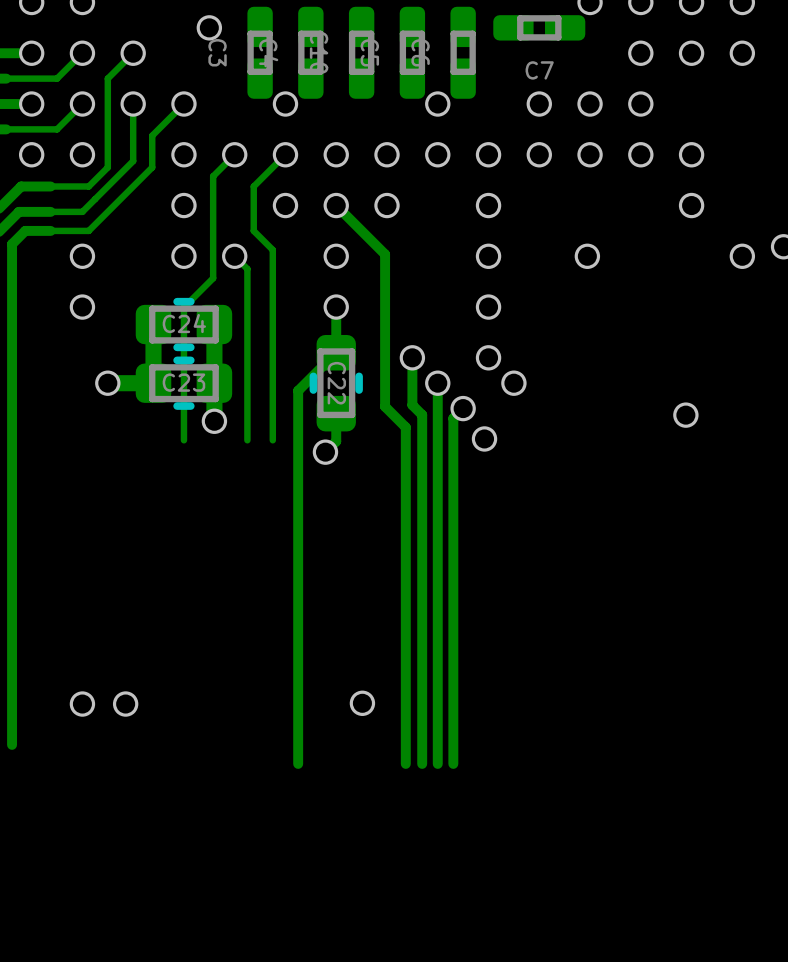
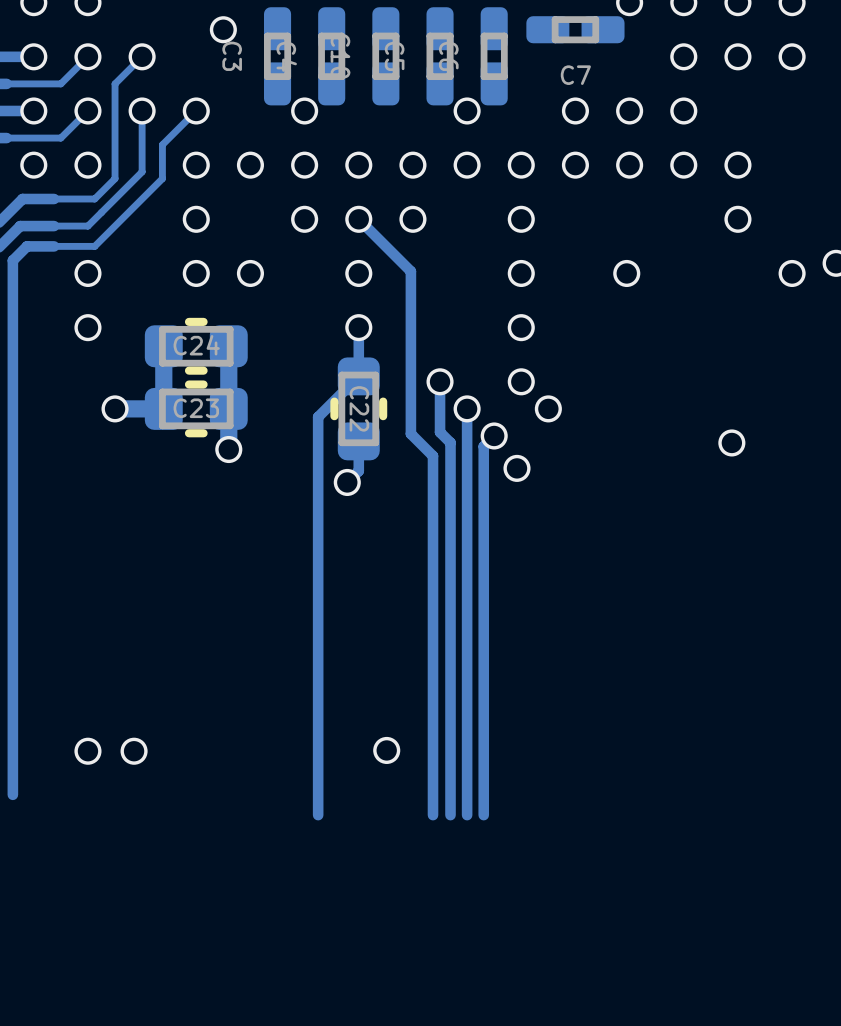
track: (234, 154) (213, 176) (213, 278) (183, 307) (183, 440) -> none
track: (285, 154) (253, 186) (253, 230) (272, 249) (272, 440) -> none
track: (234, 256) (247, 268) (247, 440) -> none

